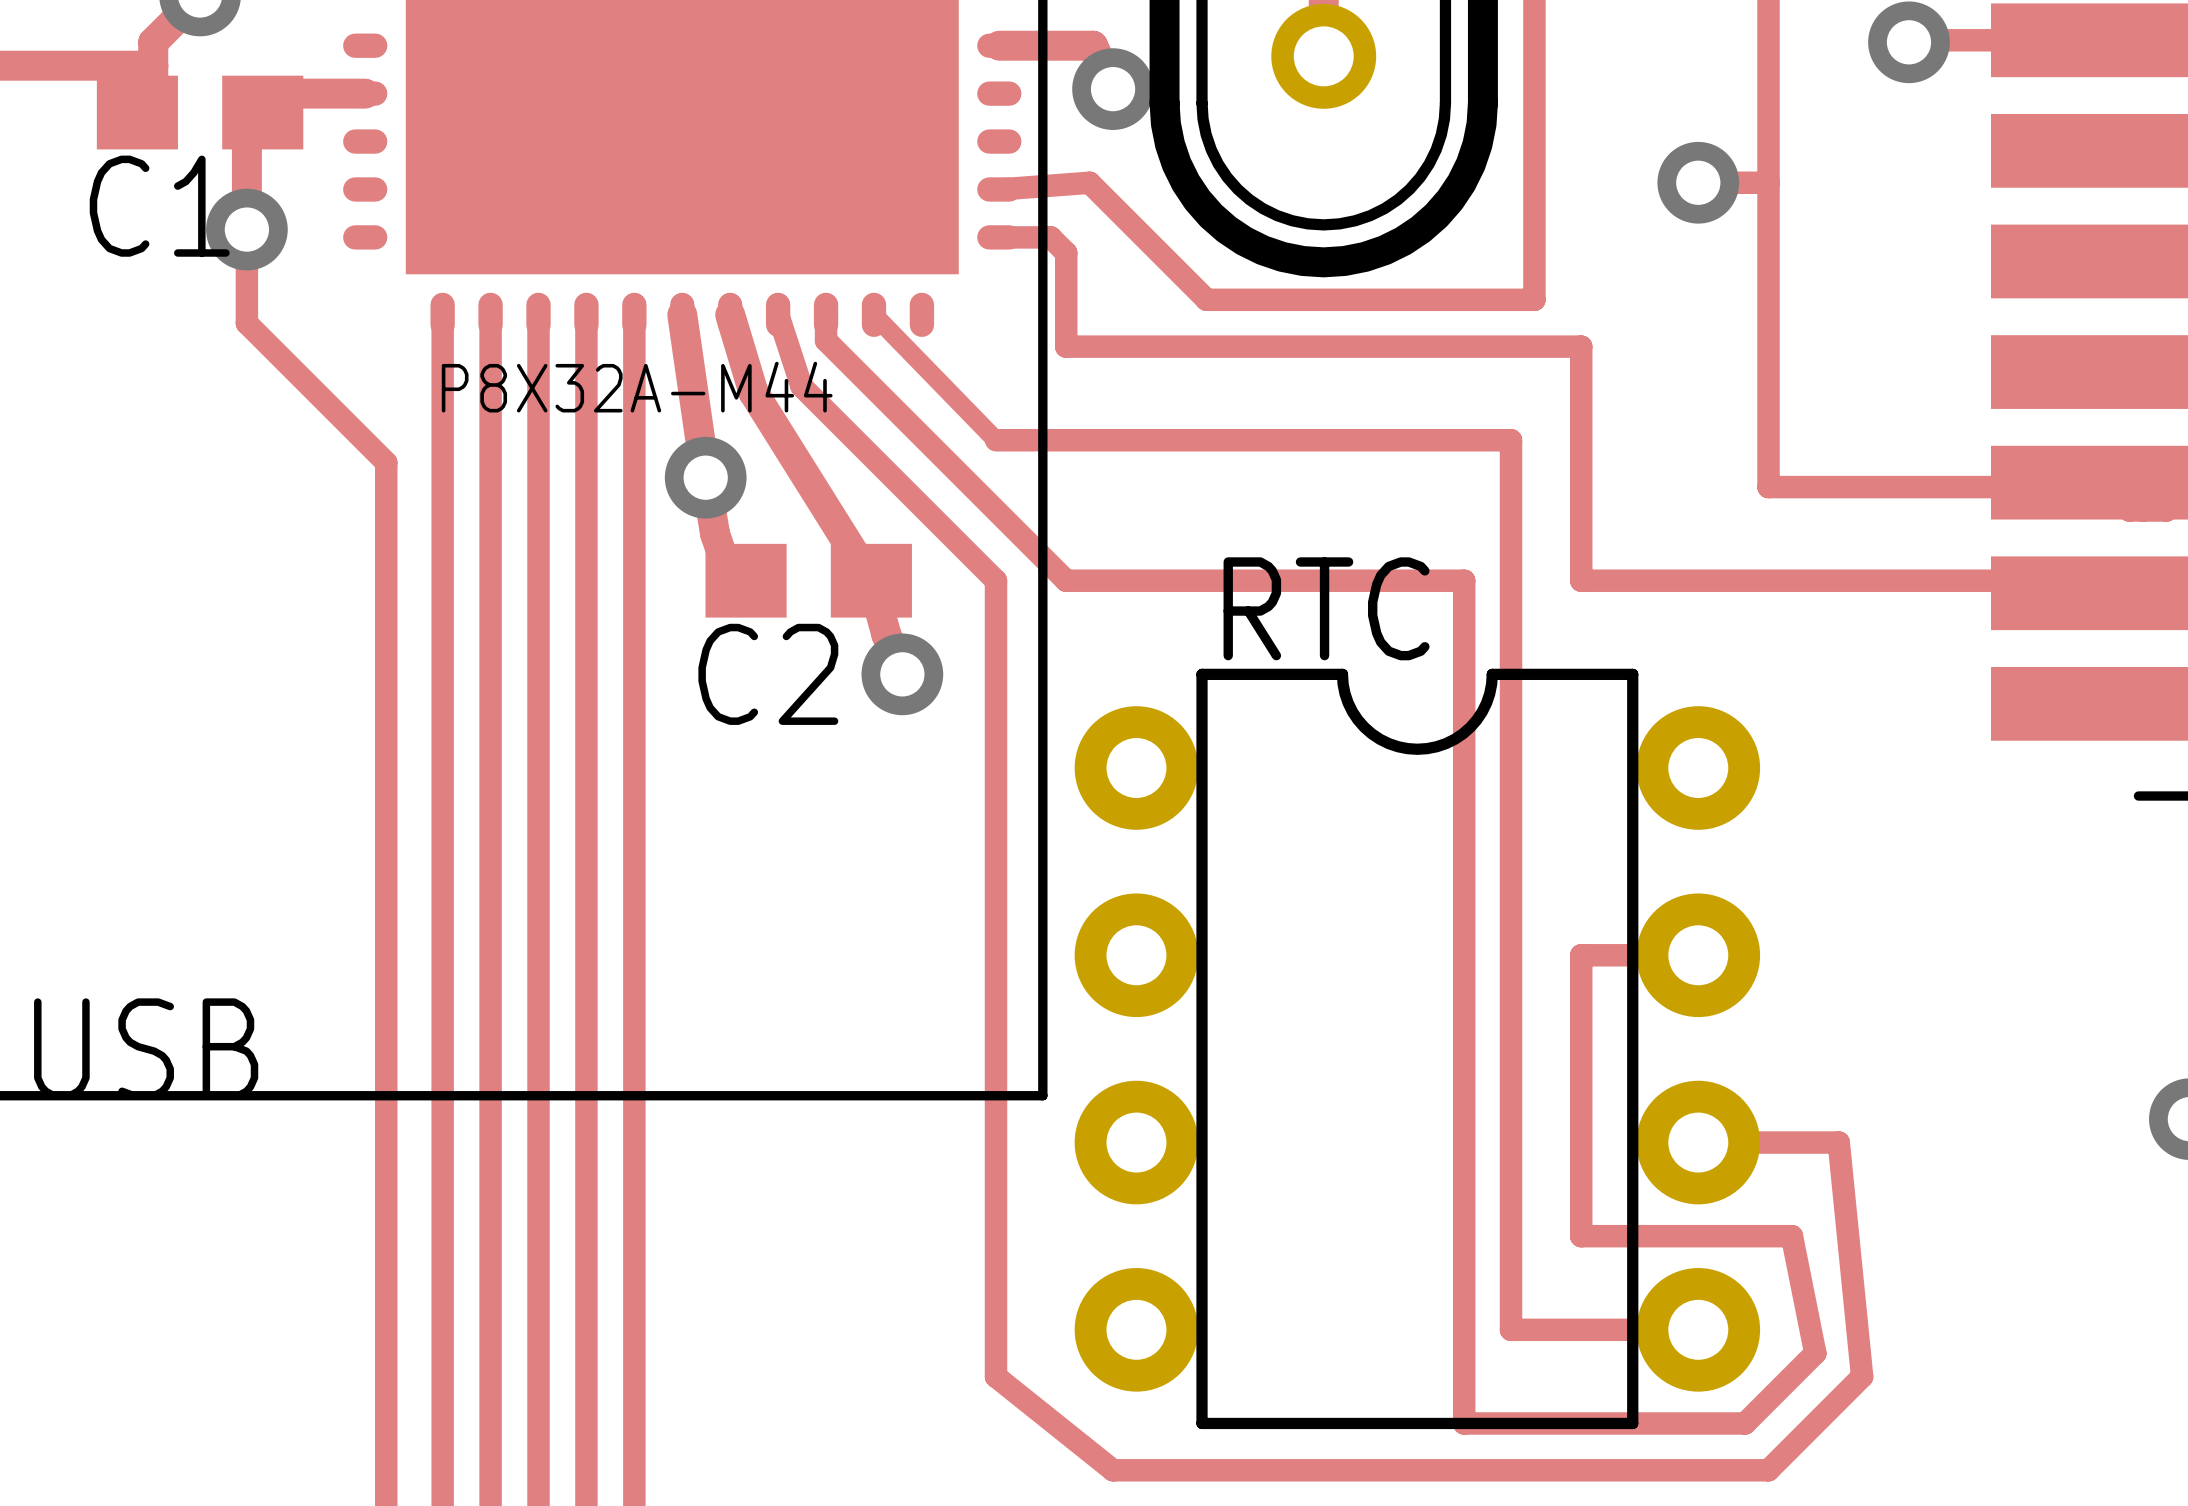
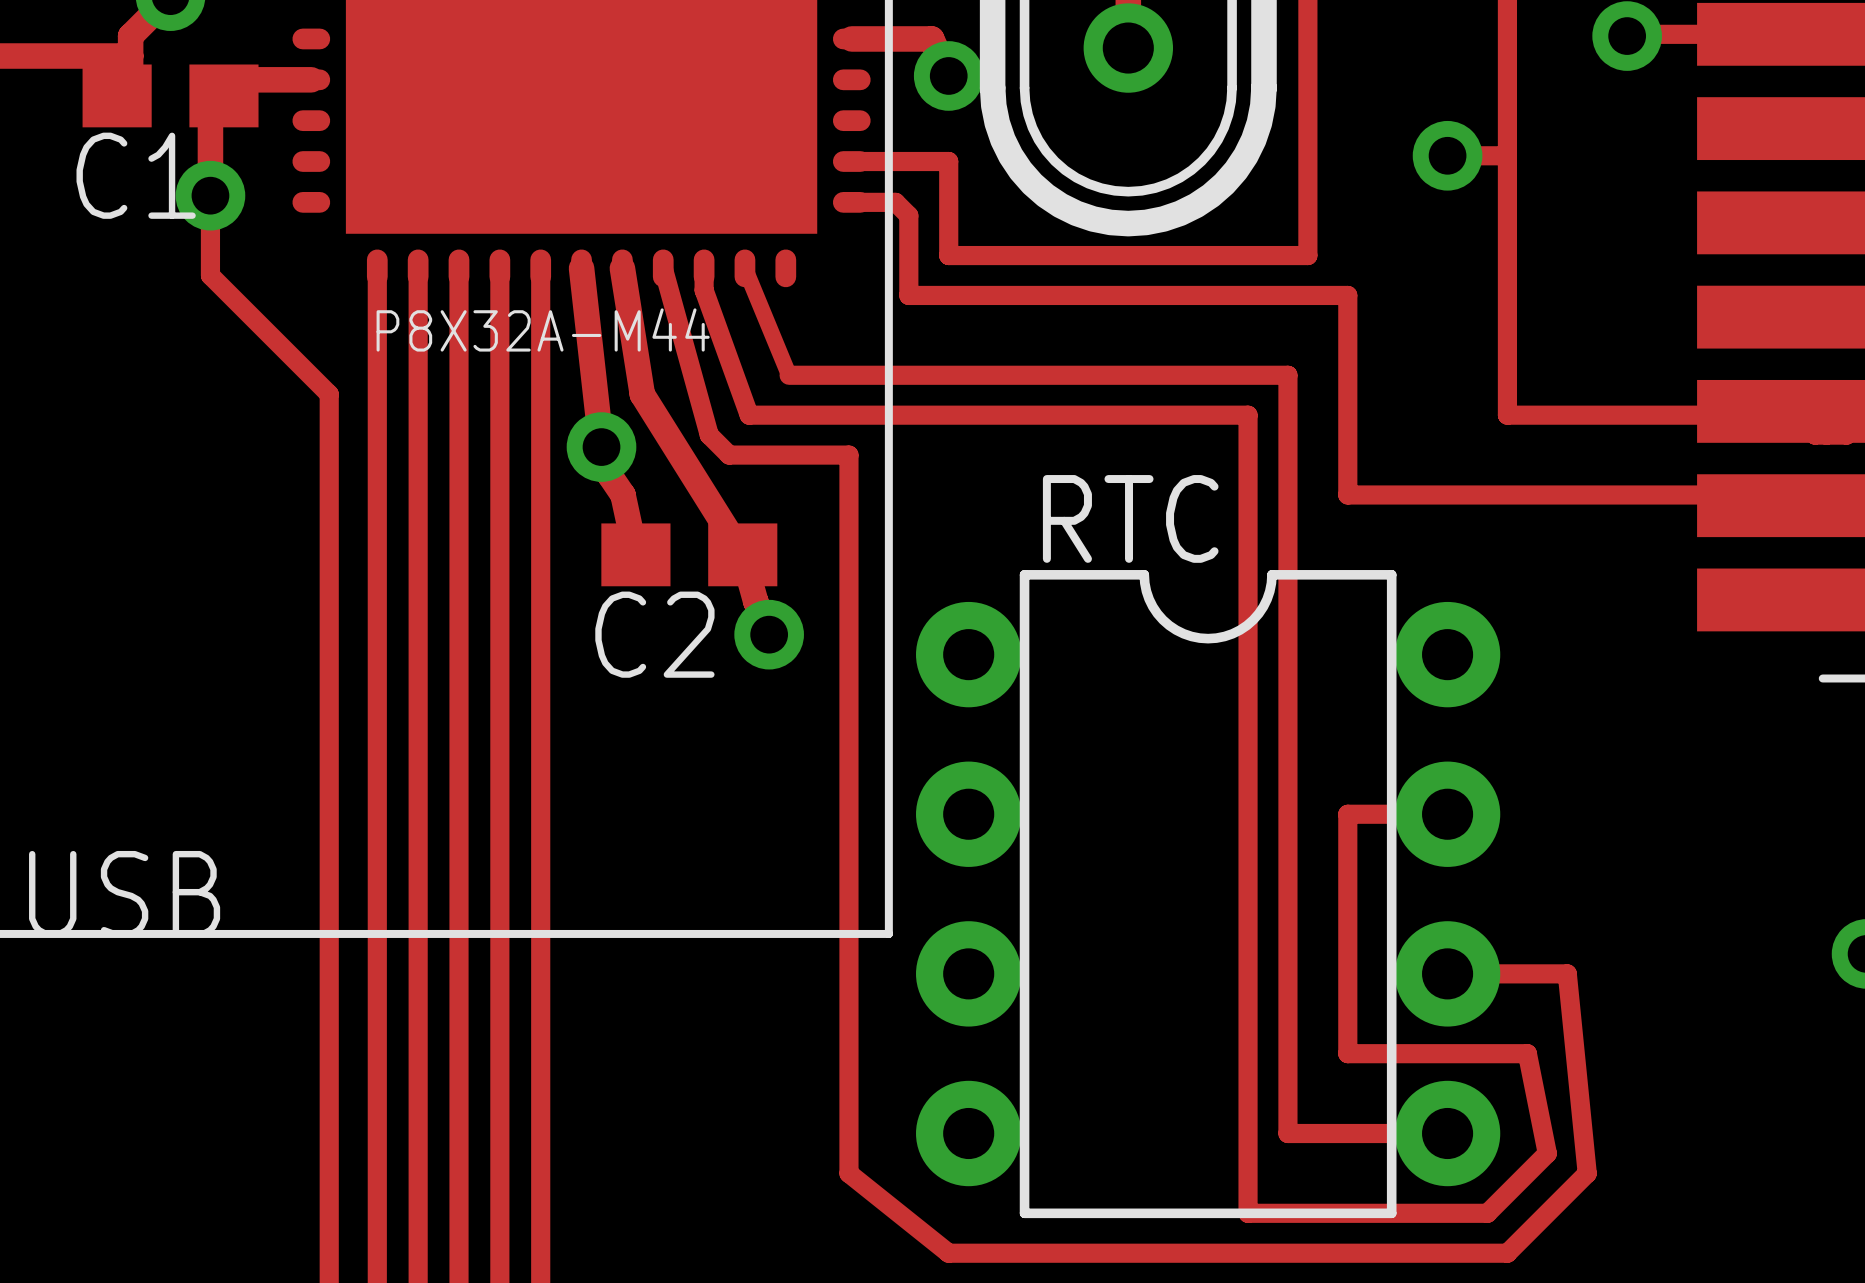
track: (999, 189) (1089, 182) (1206, 299) -> (851, 161) (948, 161) (948, 255) (1028, 255)
track: (682, 314) (715, 533) (730, 580) (746, 580) -> (581, 268) (601, 447) (609, 475) (623, 494) (635, 554)
track: (730, 314) (753, 392) (871, 580) (886, 635) (902, 674) -> (622, 268) (642, 394) (742, 554) (755, 601) (769, 634)
track: (778, 314) (801, 386) (996, 580) -> (663, 268) (709, 435) (729, 455) (848, 455) (848, 494)
track: (873, 314) (996, 440) -> (744, 268) (789, 375) (848, 375)
track: (826, 340) (1066, 580) (1464, 580) -> (704, 290) (749, 415) (1248, 415) (1248, 494)
via position: (705, 477) -> (601, 447)
C2 position: (808, 580) -> (689, 554)
via position: (902, 674) -> (769, 634)

